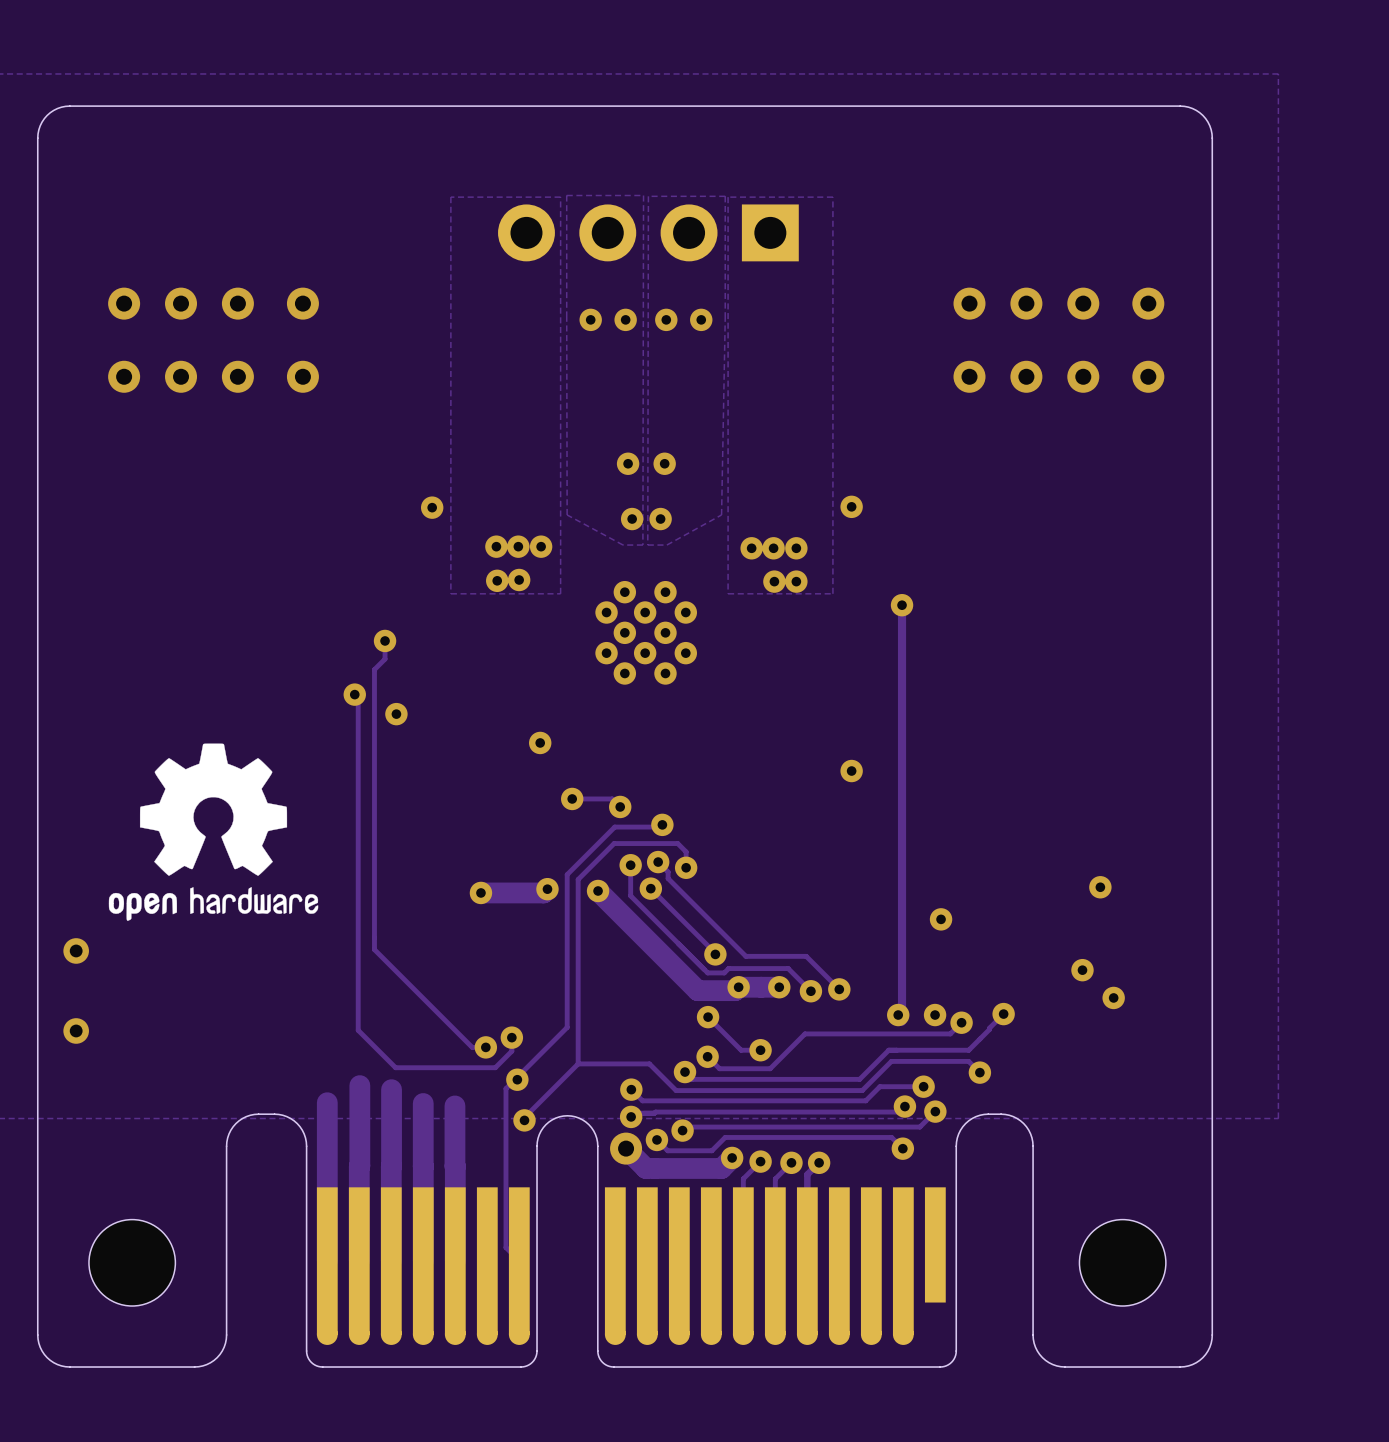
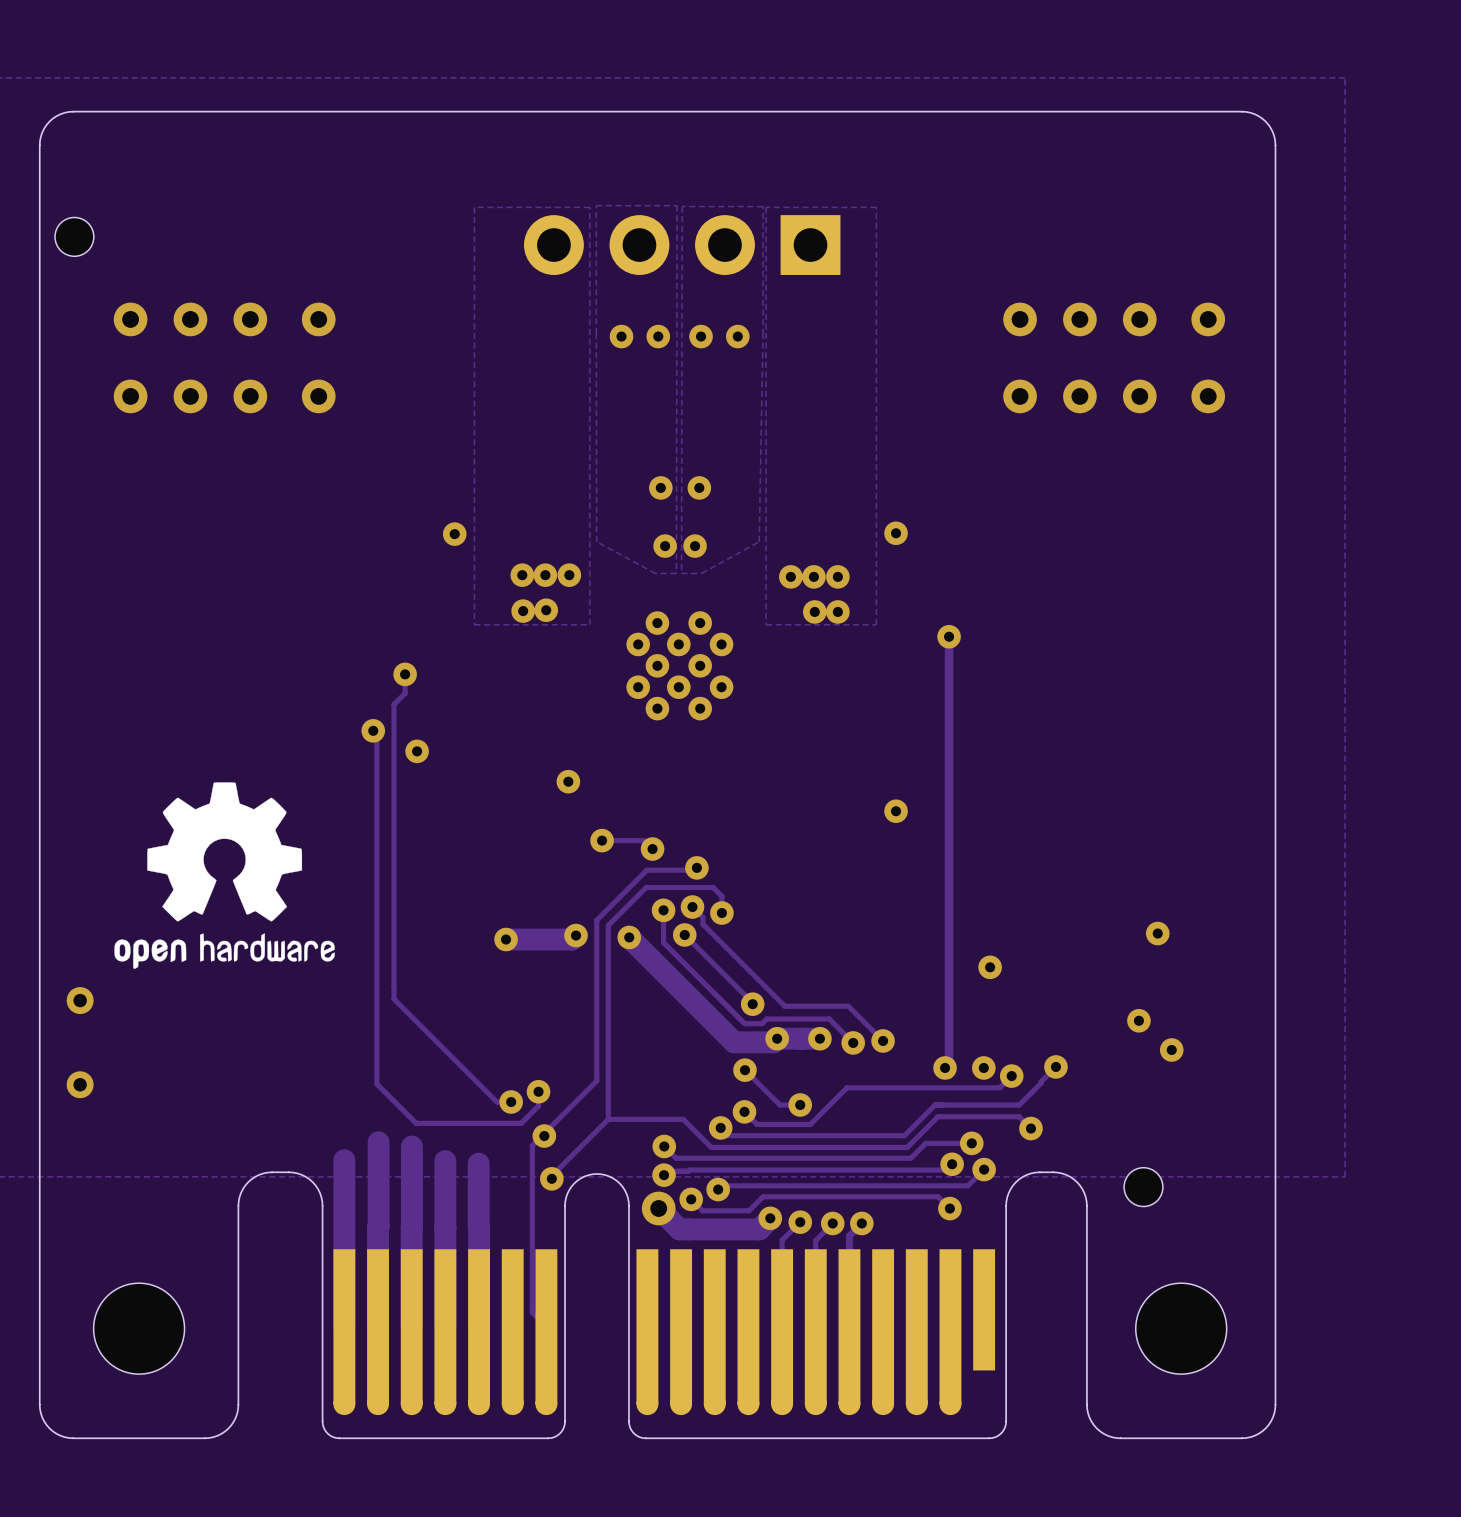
part: none -> (74, 236)
part: none -> (1143, 1187)

